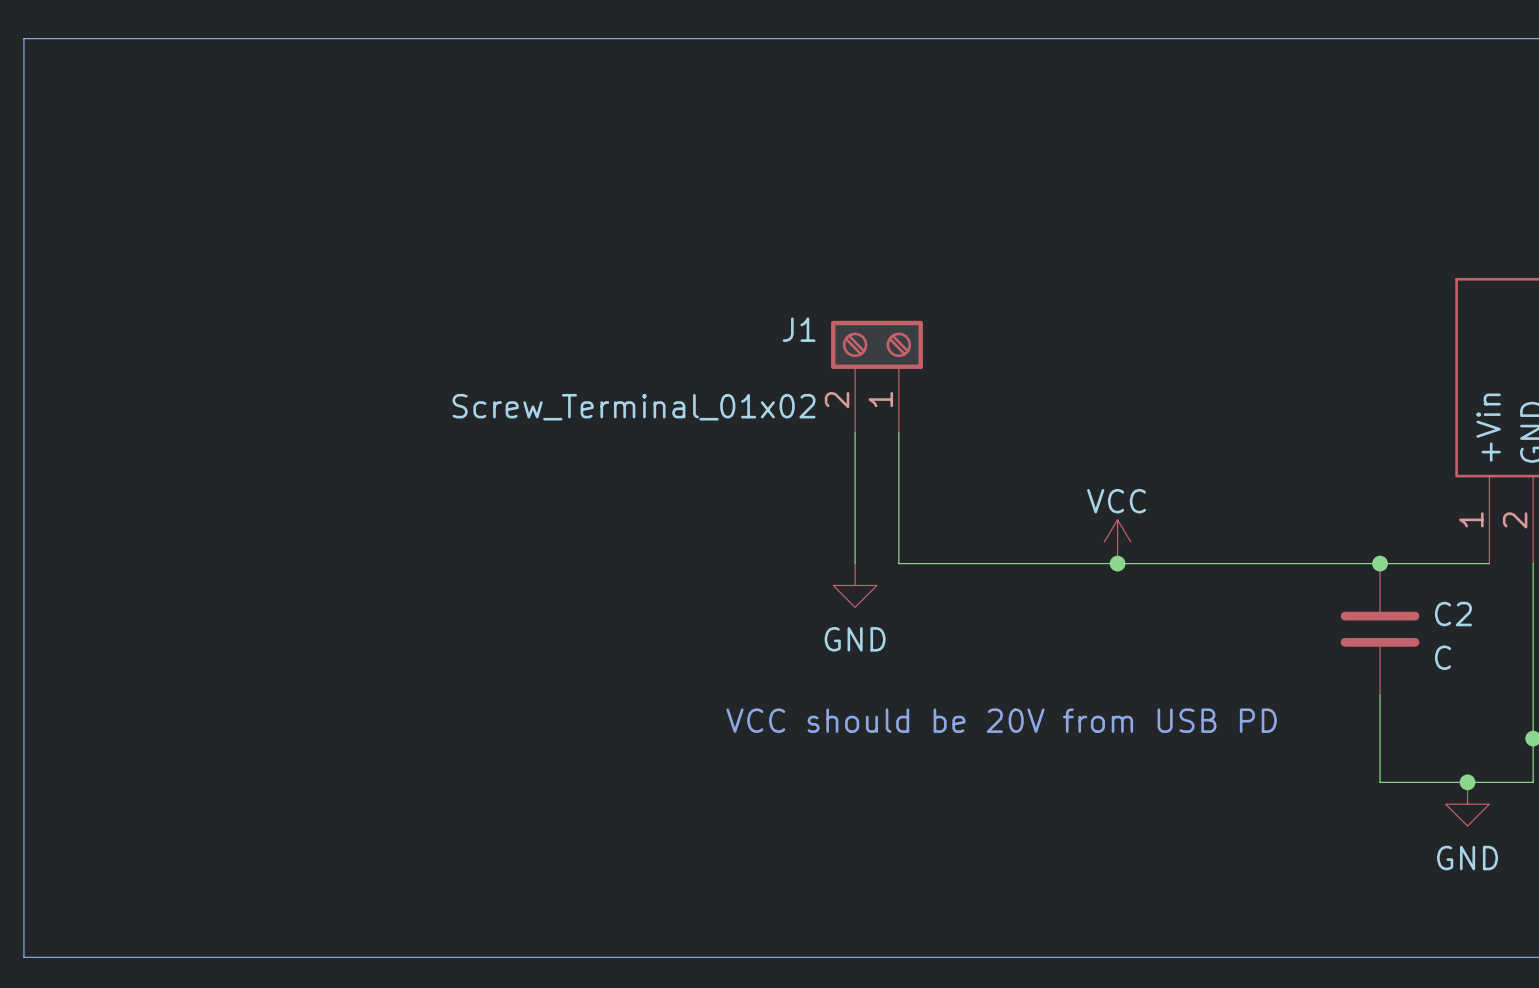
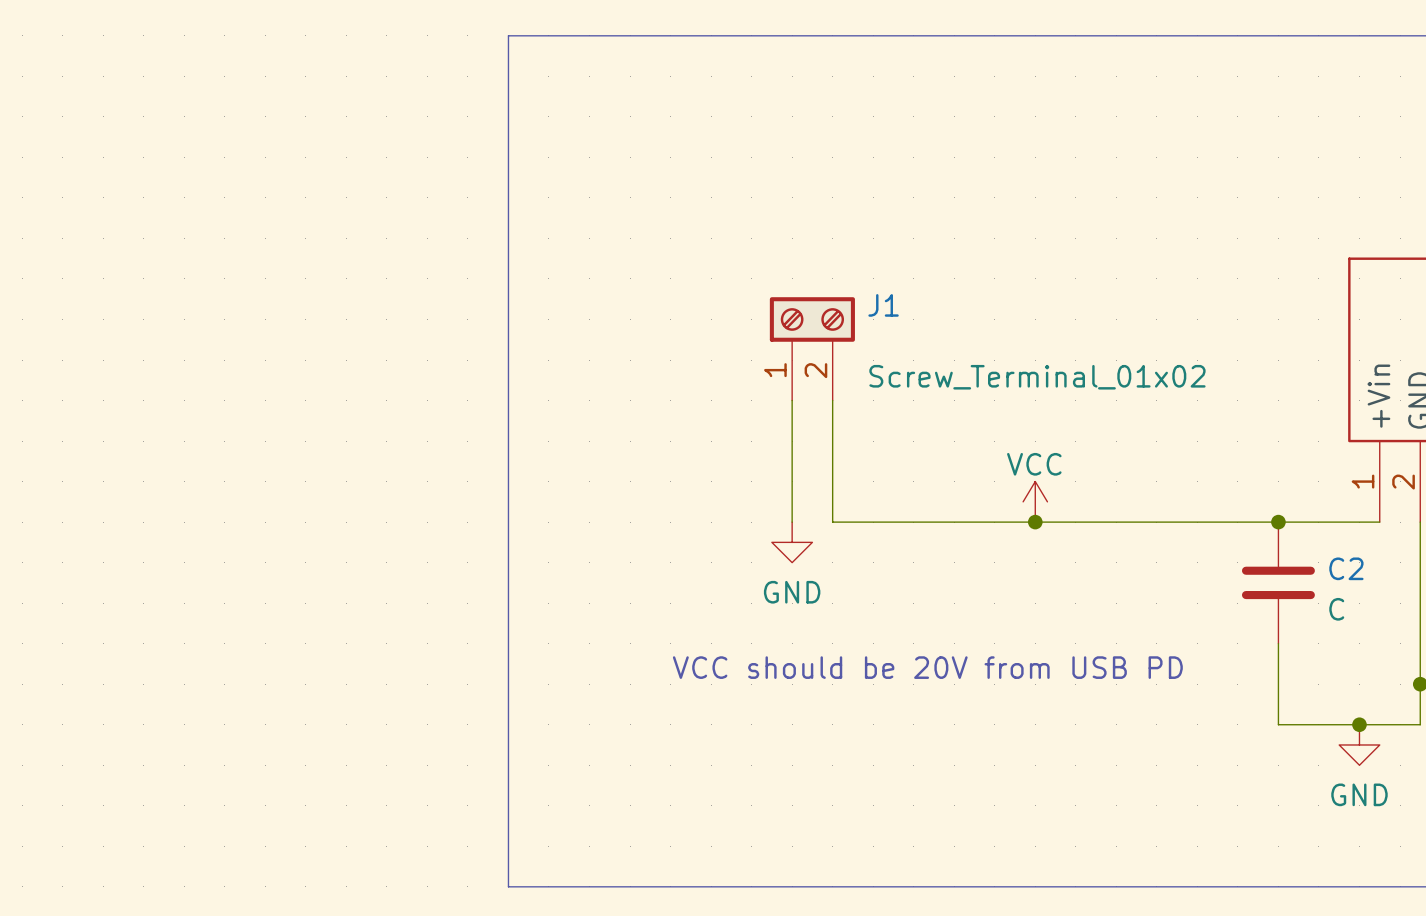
line: (548, 38) (23, 38) (23, 957) (548, 957) -> (508, 35) (508, 886)
J1 flip: as is (876, 344) -> left-right (812, 319)

